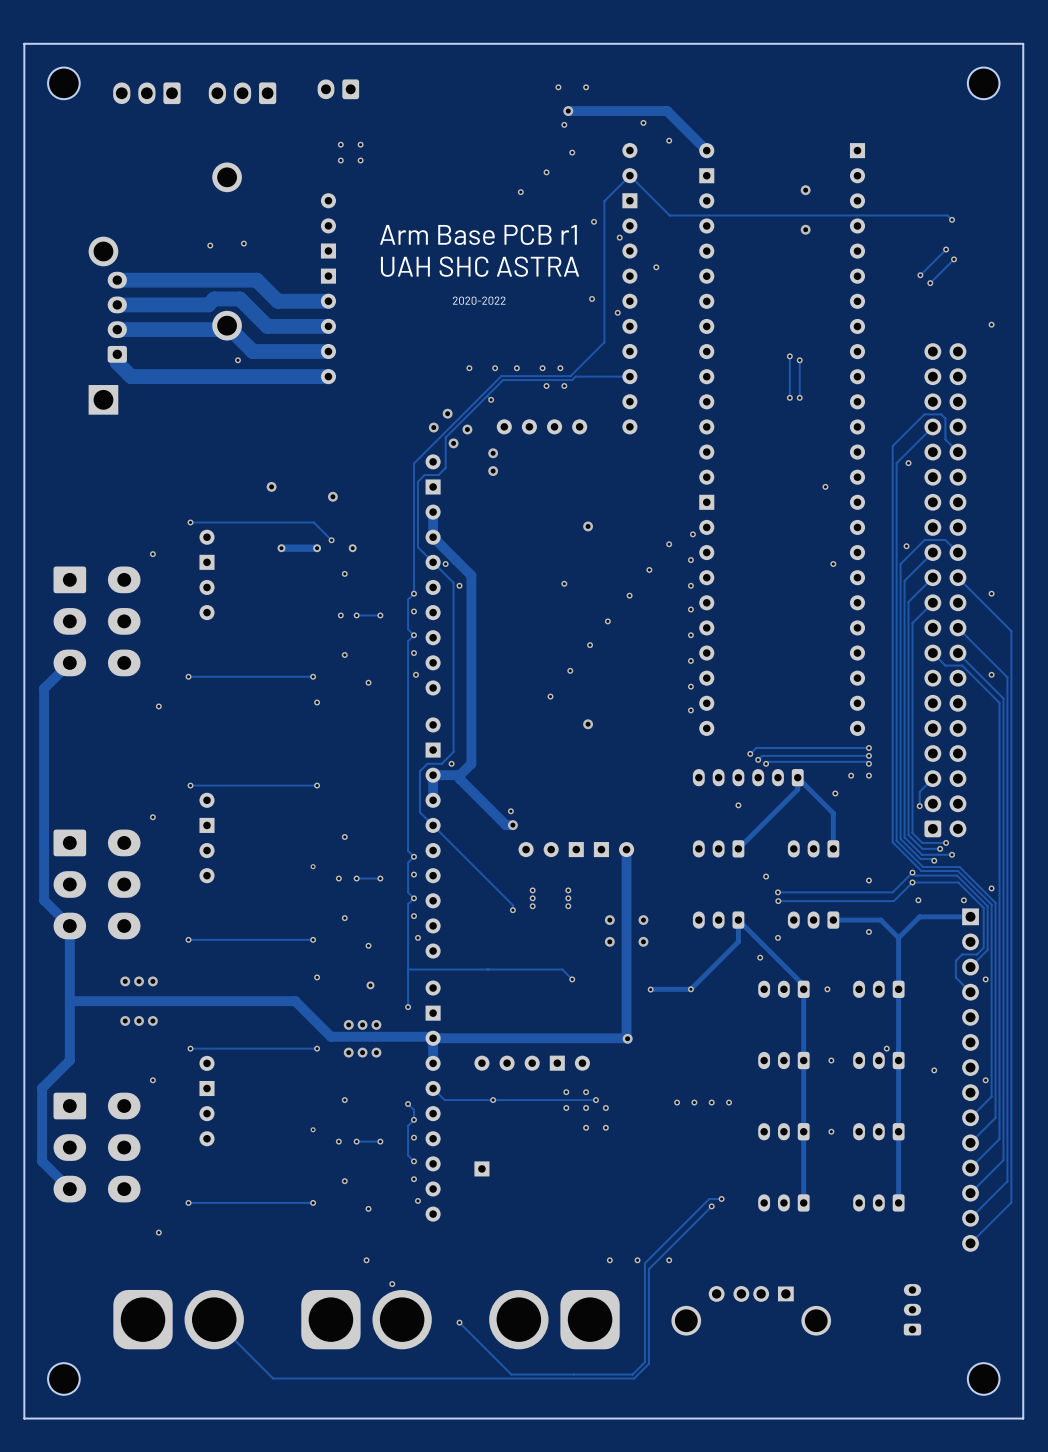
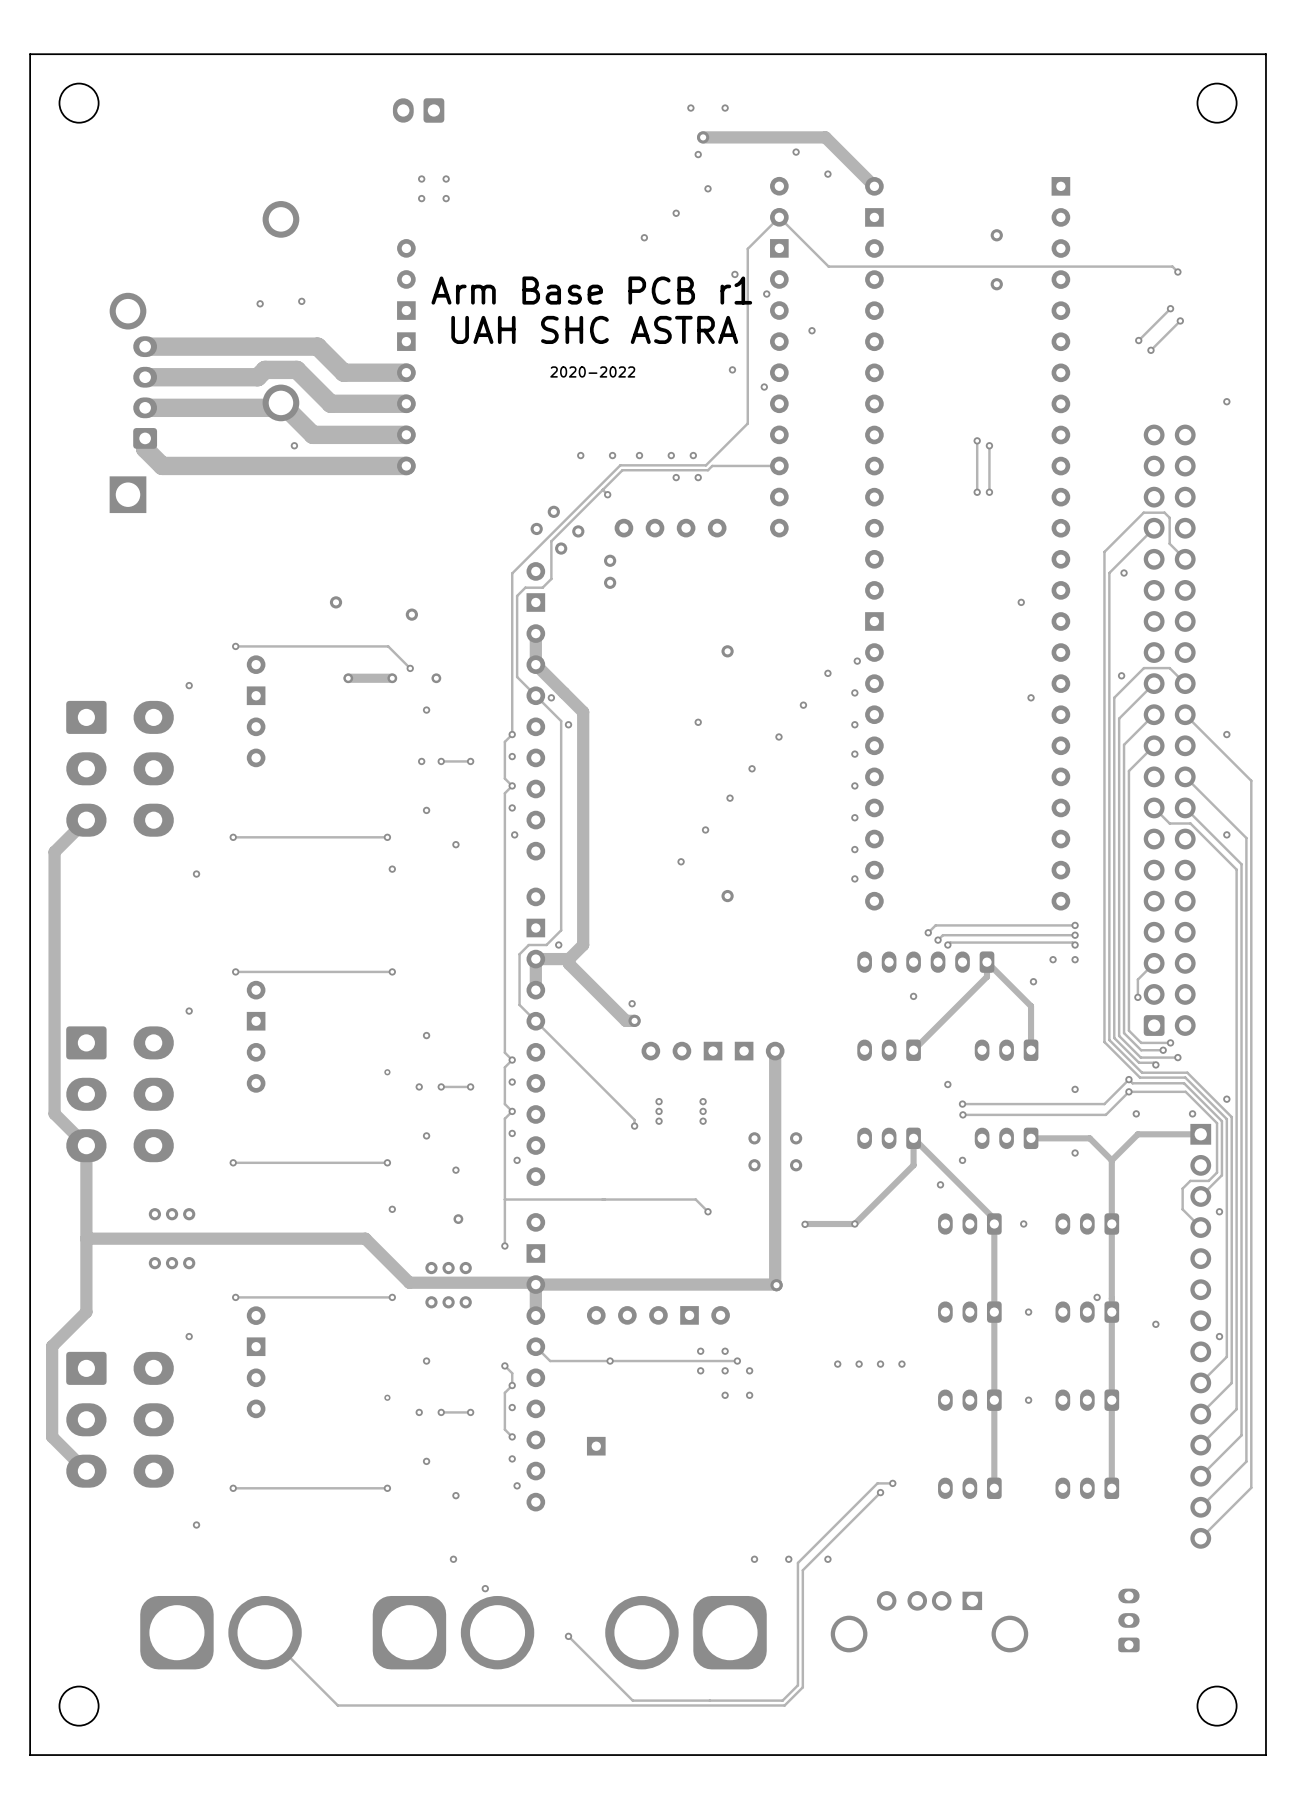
part: (146, 93) -> none
part: (242, 93) -> none

